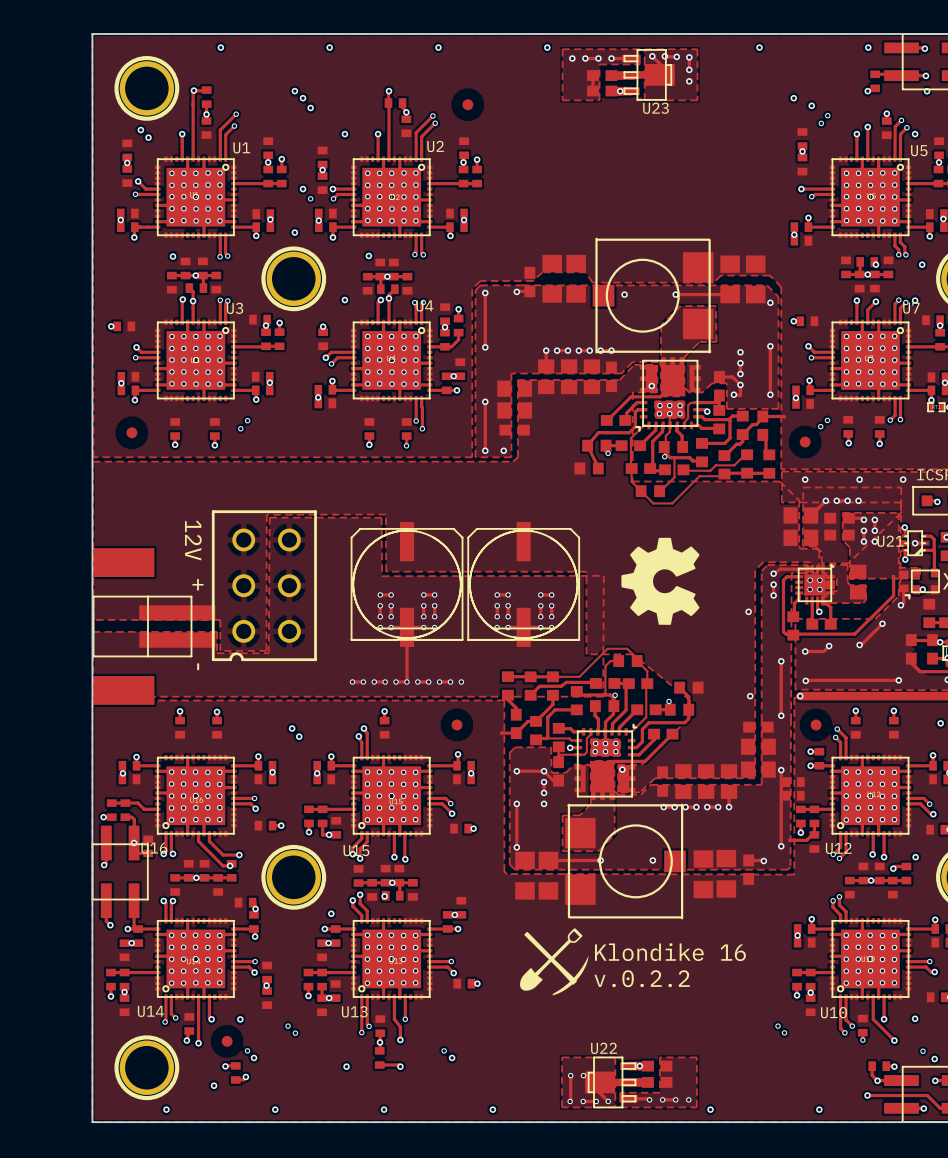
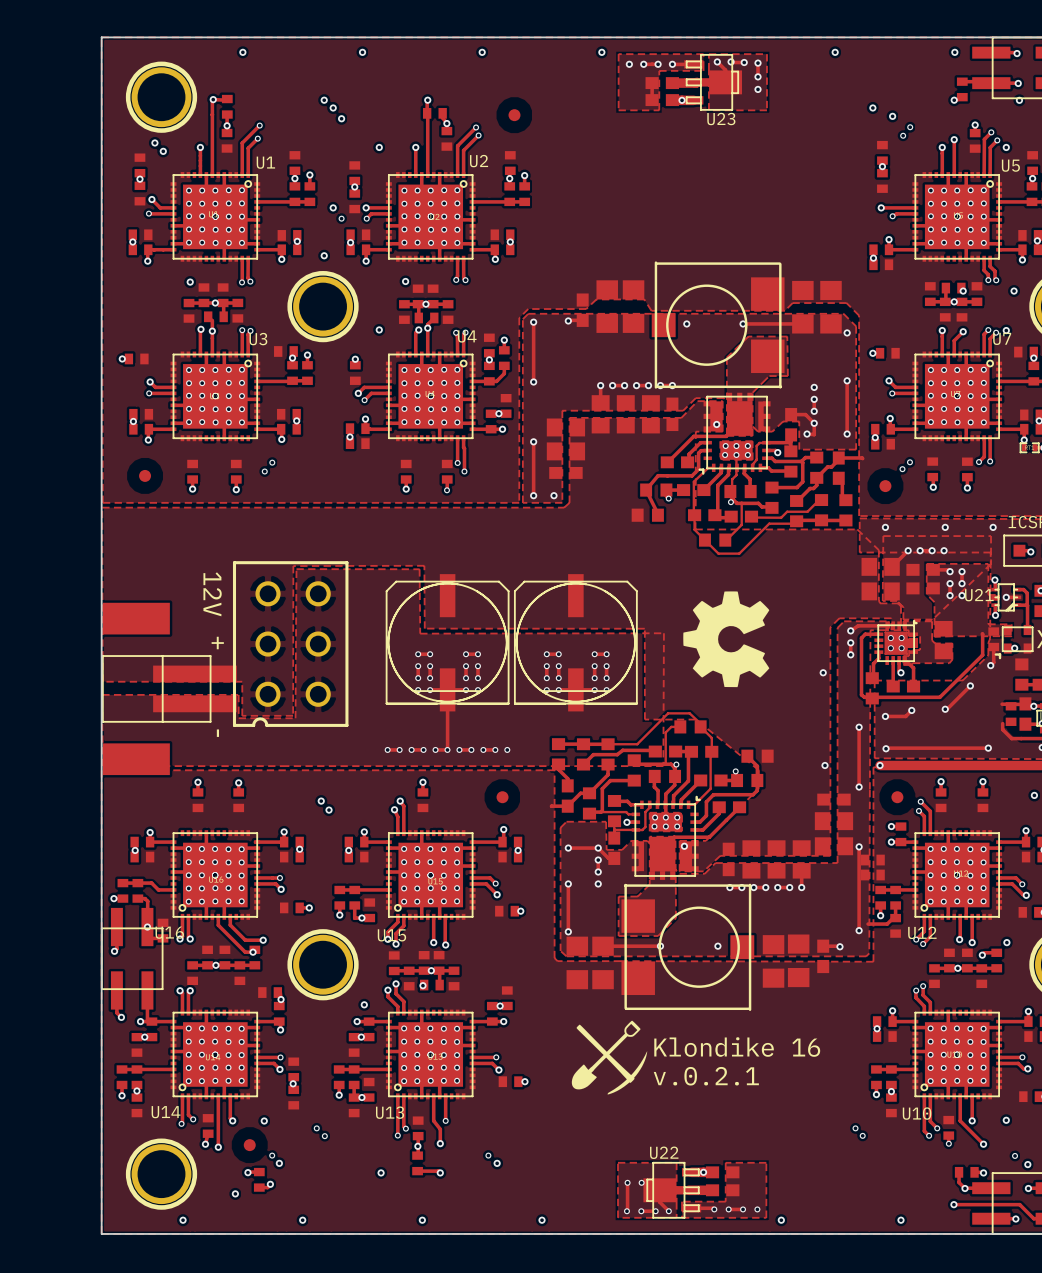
part footprint: [905, 634, 917, 665] -> [1005, 702, 1017, 726]
text: v.0.2.2 (642, 978) -> v.0.2.1 (706, 1076)

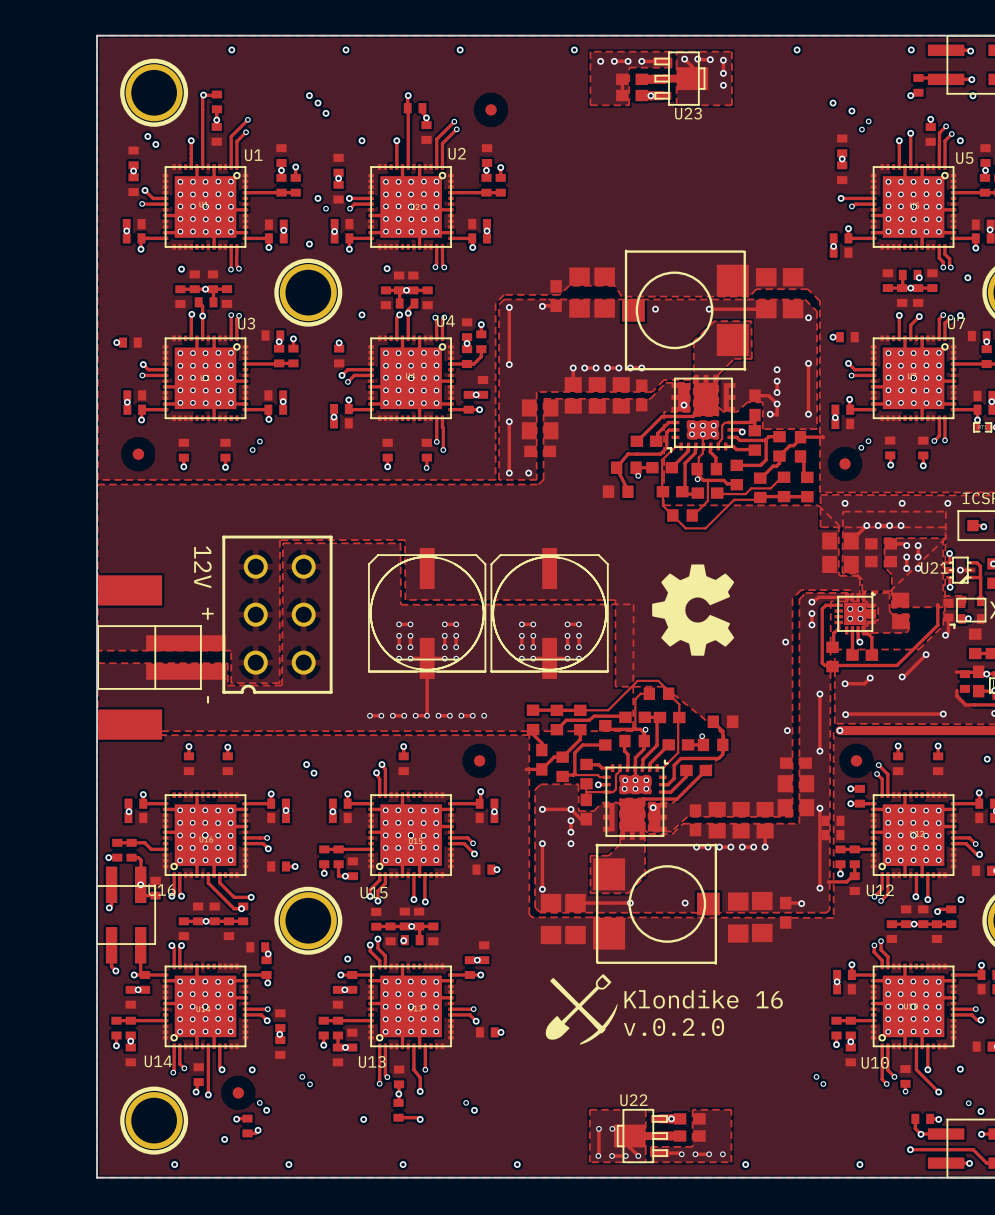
text: v.0.2.1 (706, 1076) -> v.0.2.0 (674, 1027)

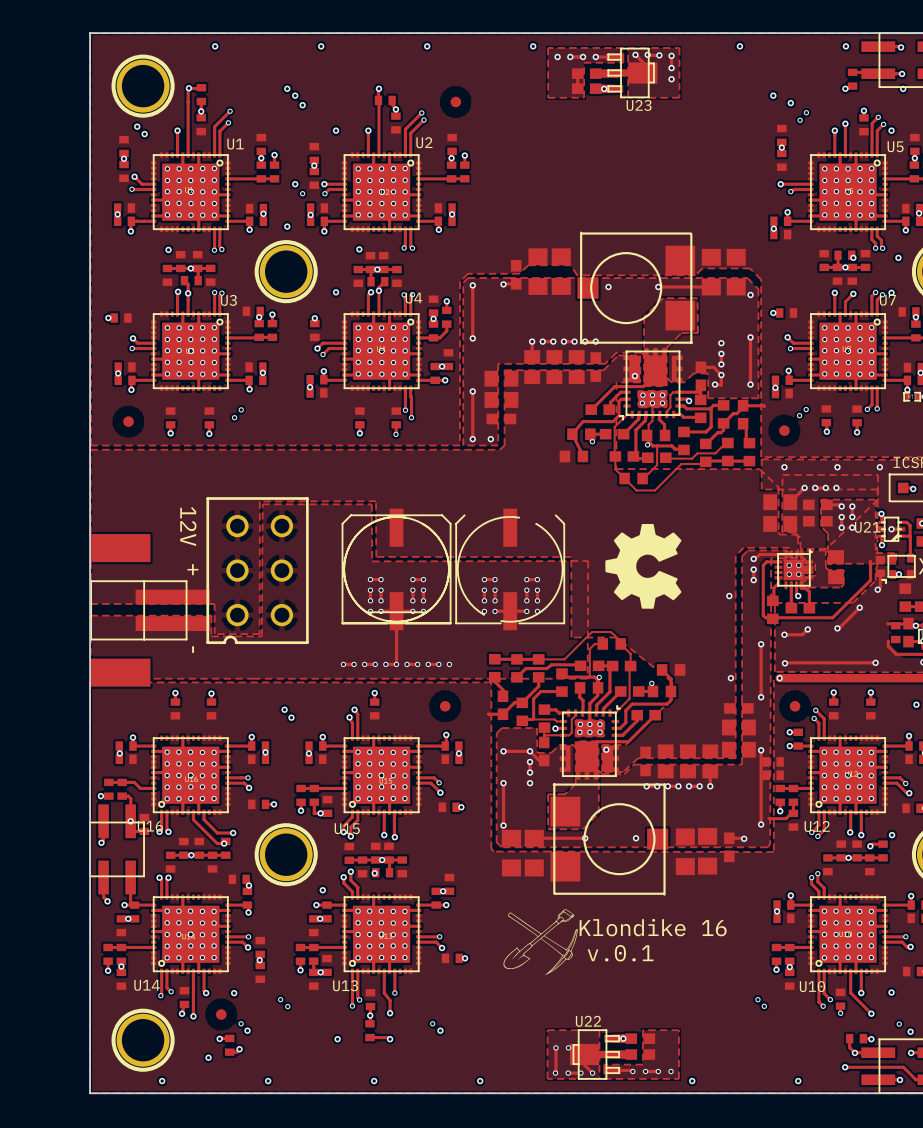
part footprint: [490, 547, 609, 679] -> [455, 508, 565, 631]
drawing shape: [545, 974, 618, 1045] -> [503, 909, 578, 976]
text: v.0.2.0 (674, 1027) -> v.0.1 (620, 953)

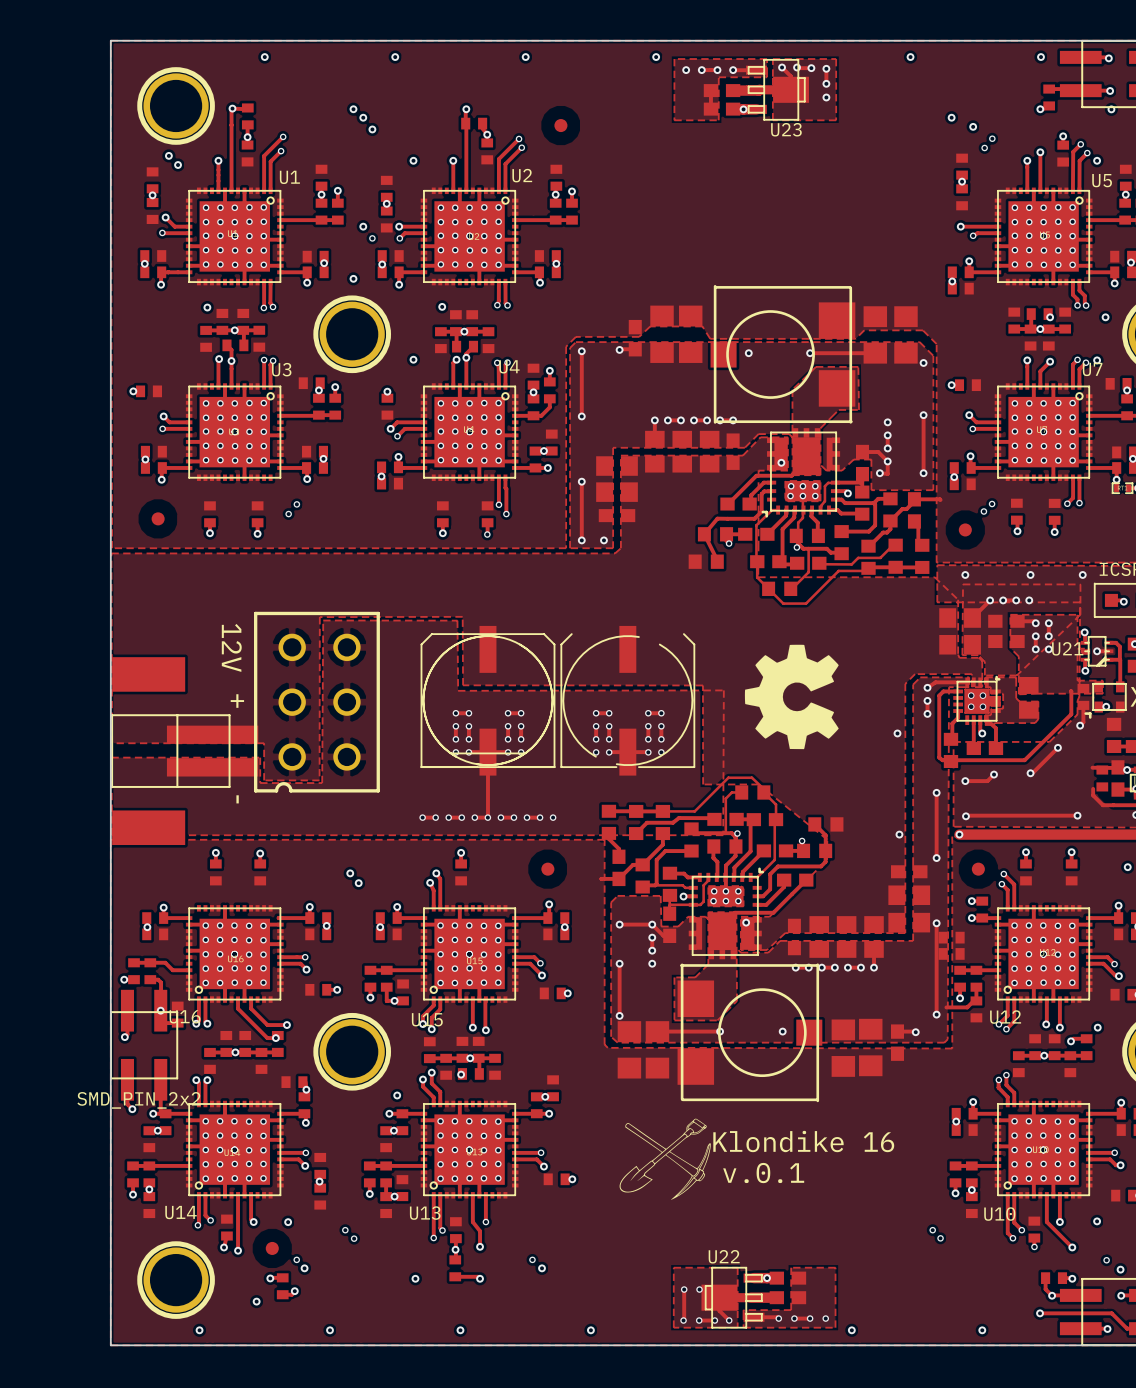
SMD_PIN_2x2 name: none -> SMD_PIN_2x2 (139, 1100)

